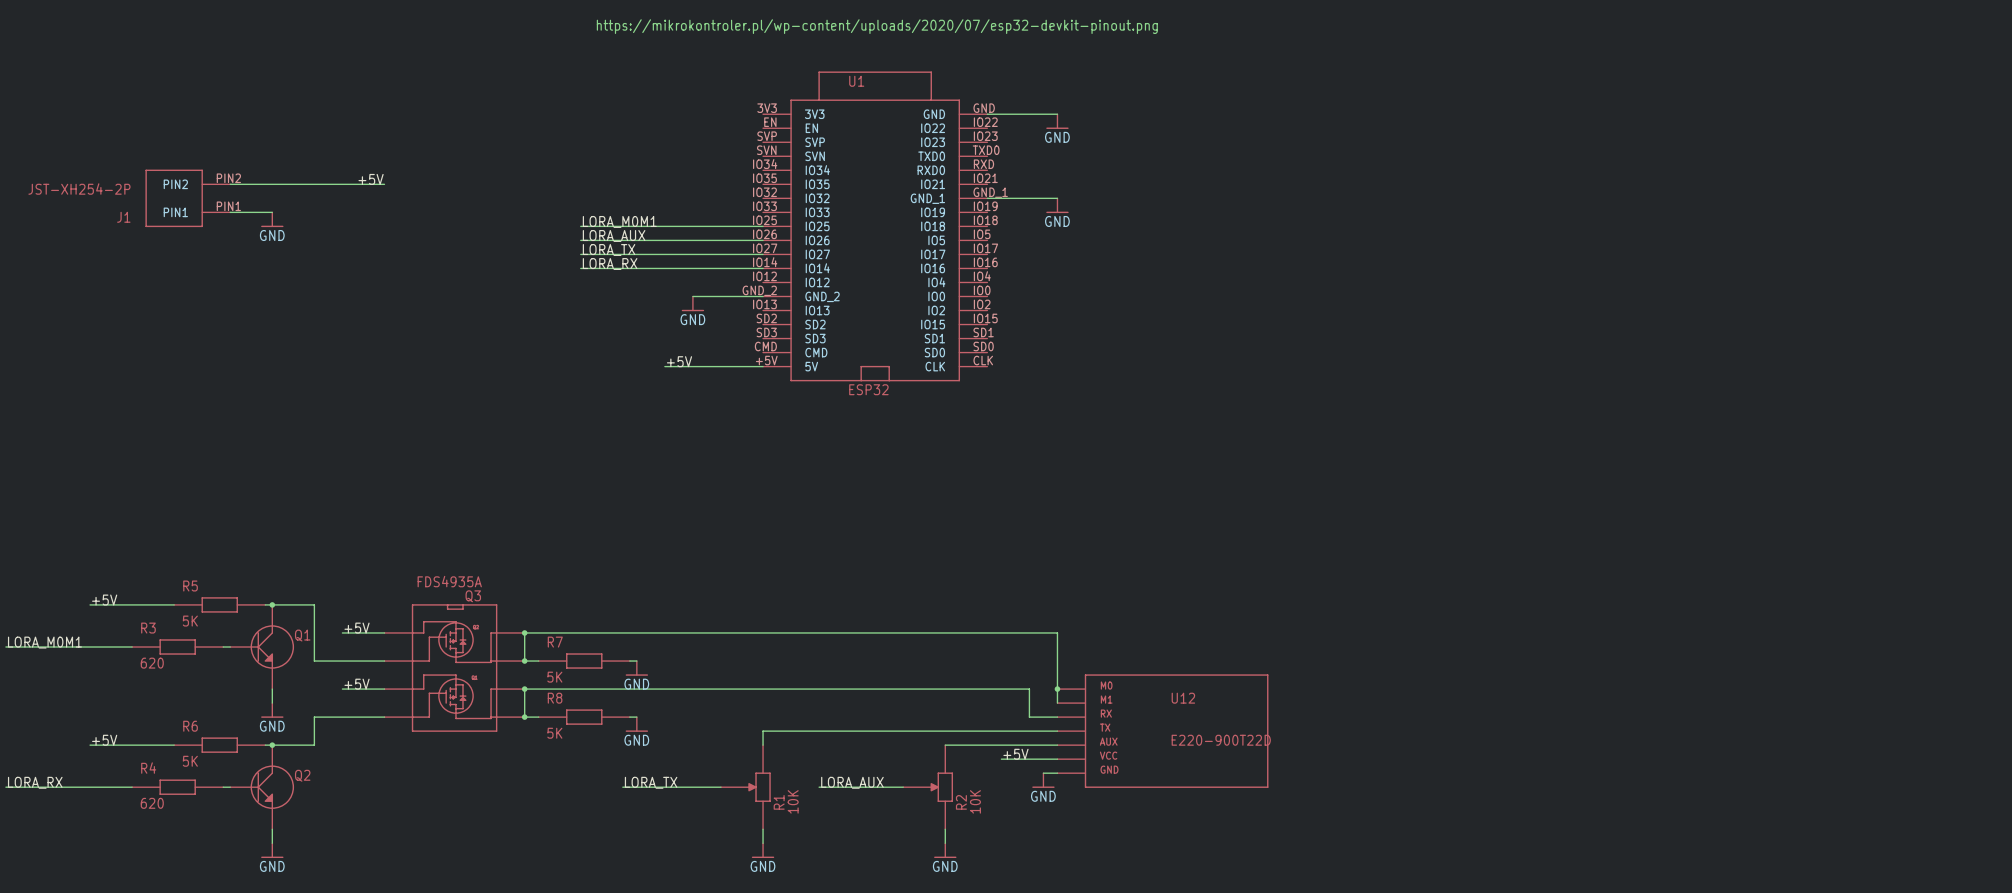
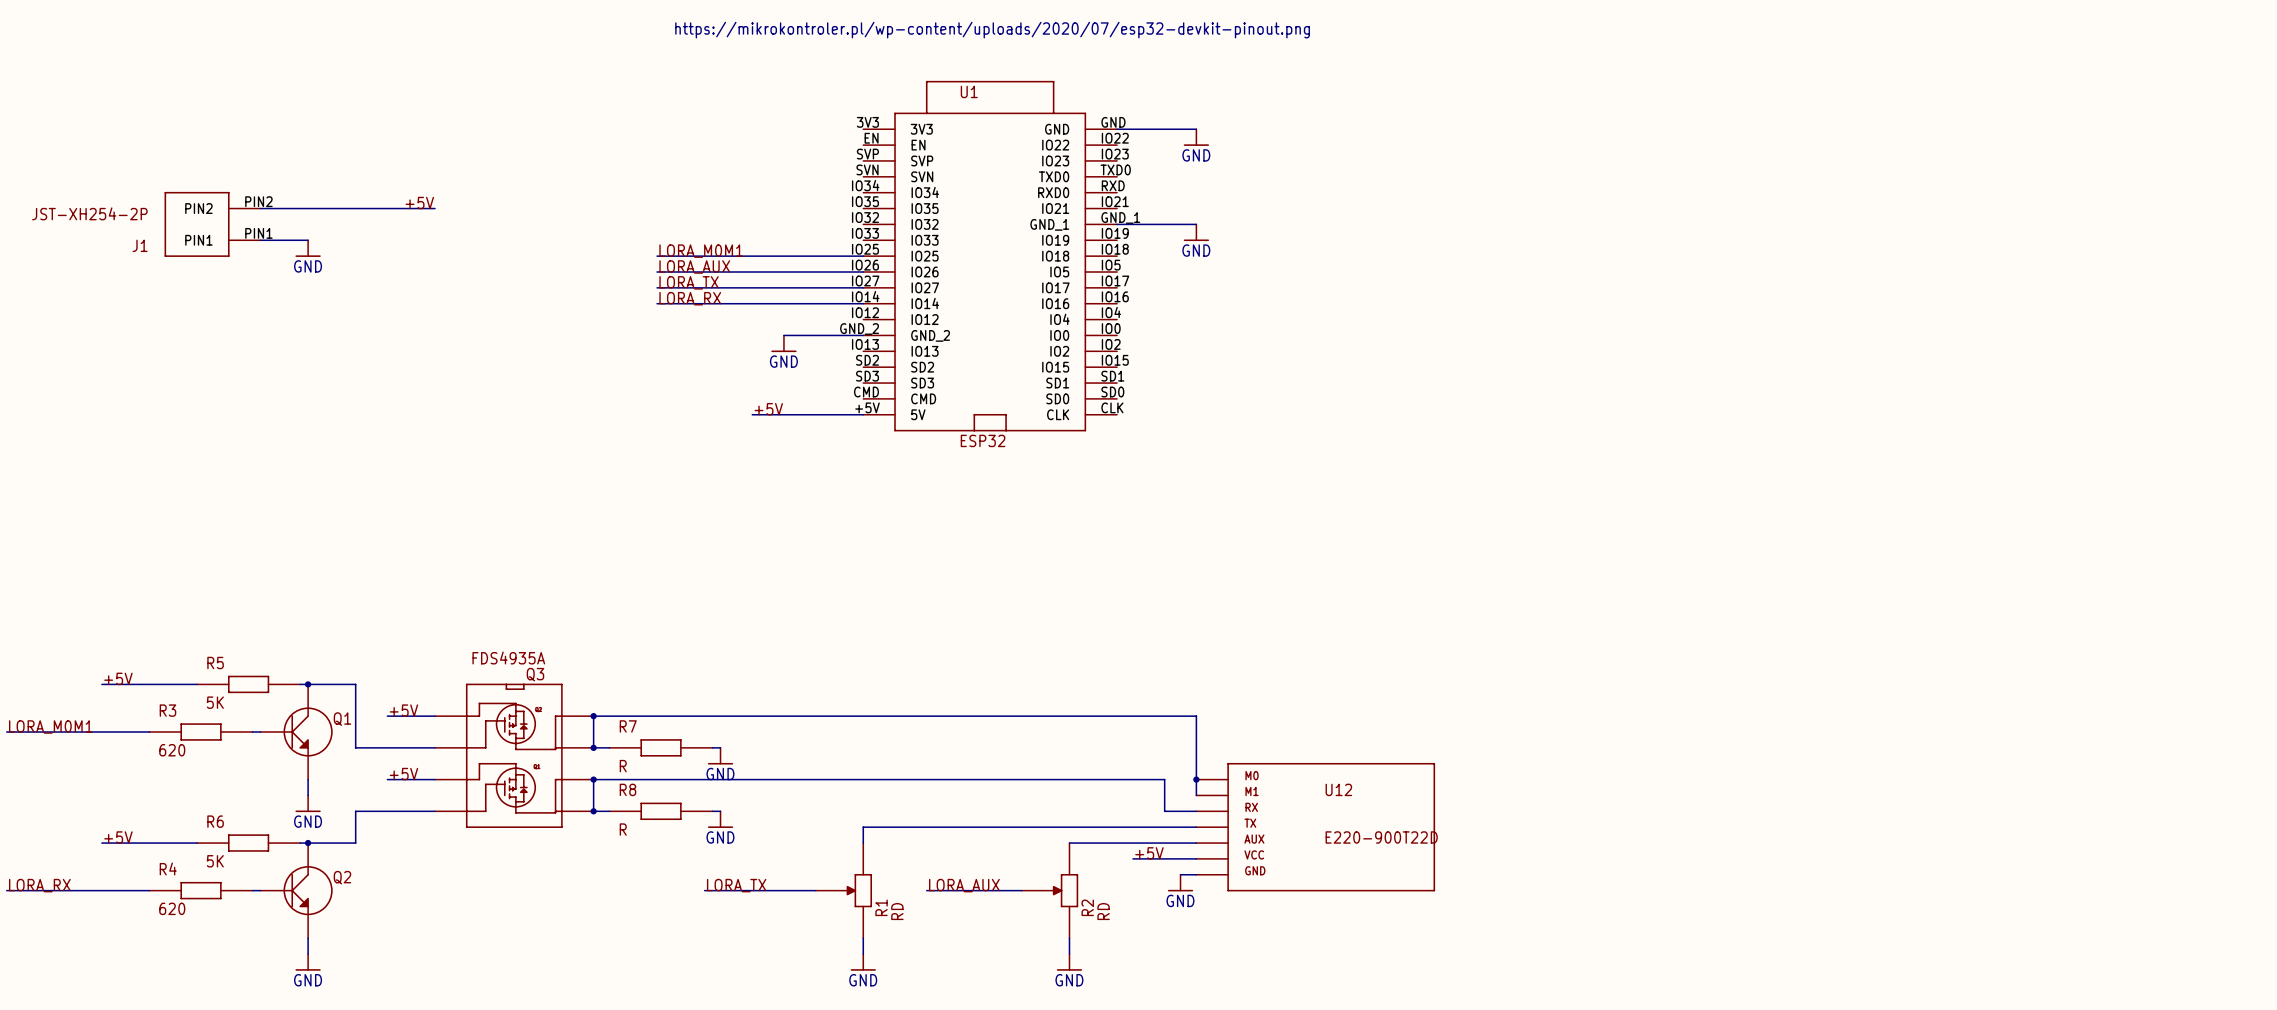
R7 value: 5K (554, 677) -> R (623, 766)
R8 value: 5K (554, 733) -> R (623, 829)
R1 value: 10K (793, 801) -> RD (897, 911)
R2 value: 10K (975, 801) -> RD (1103, 911)

